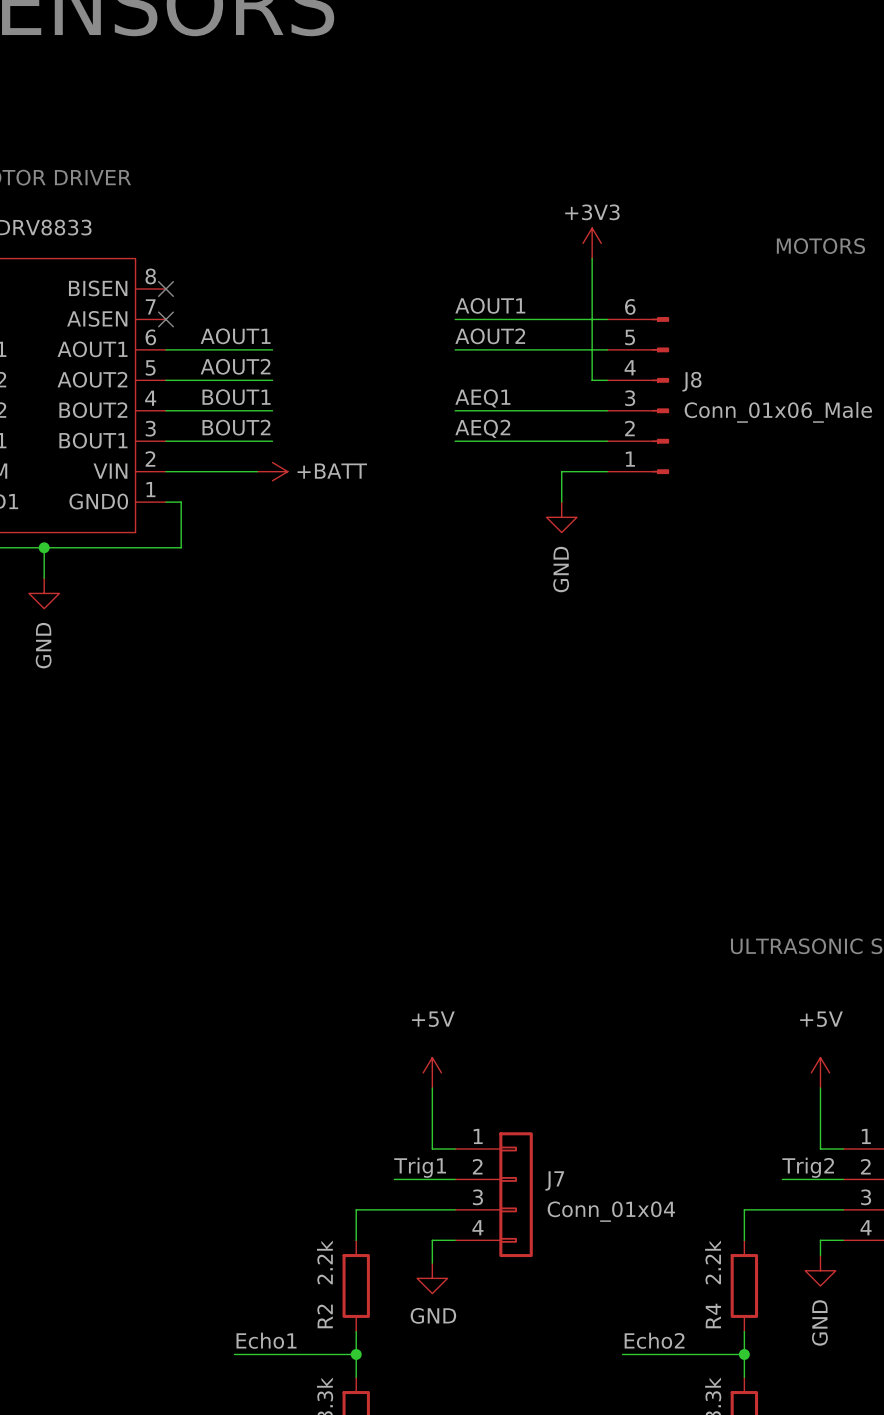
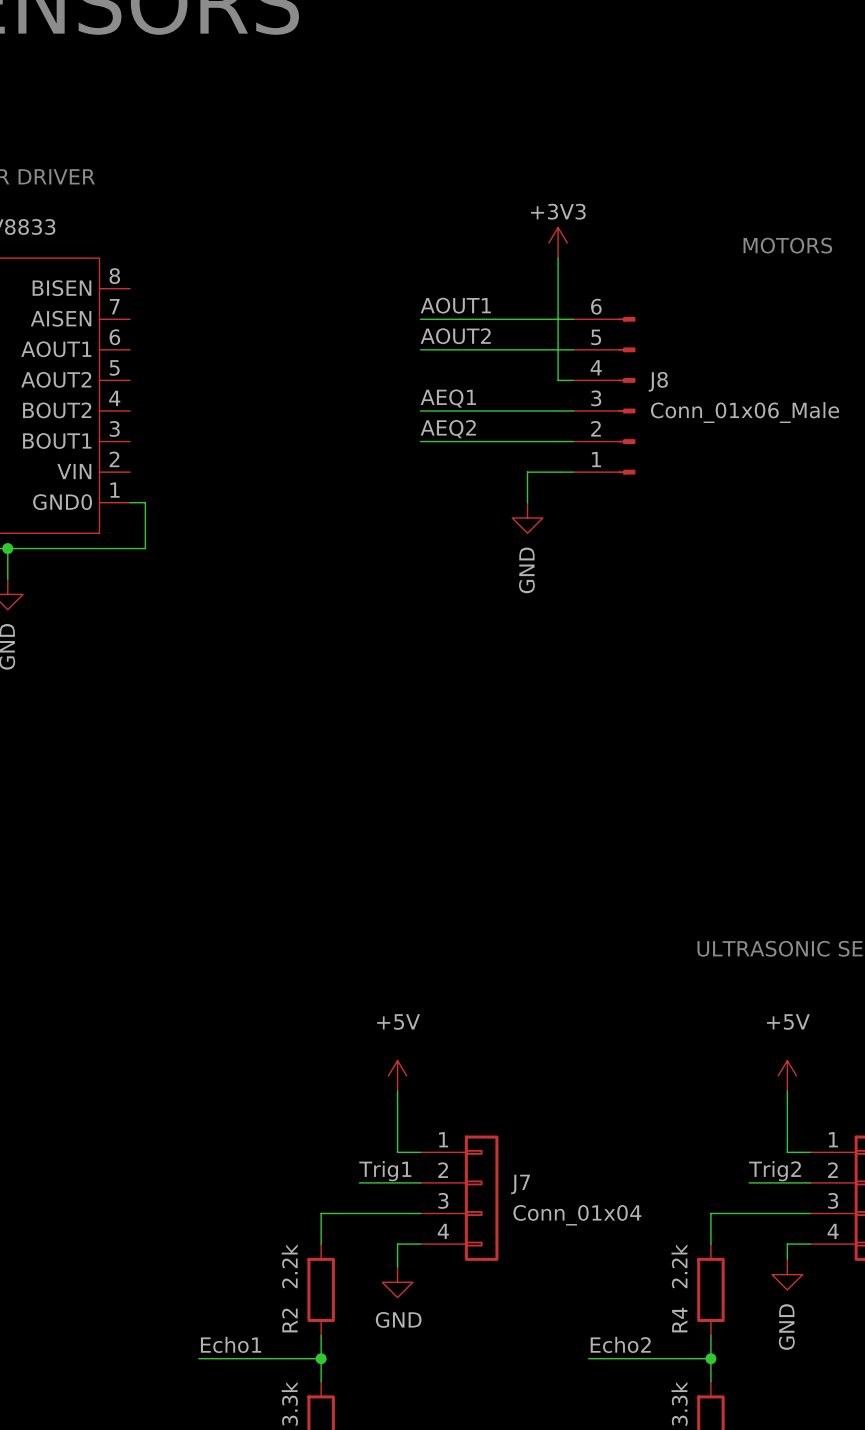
no-connect mark: (165, 289) -> none
no-connect mark: (165, 319) -> none
label: AOUT1 (235, 336) -> none
wire: (165, 349) (272, 349) -> none
label: AOUT2 (235, 366) -> none
wire: (165, 380) (272, 380) -> none
label: BOUT1 (236, 397) -> none
wire: (165, 410) (272, 410) -> none
label: BOUT2 (236, 427) -> none
wire: (165, 441) (272, 441) -> none
wire: (165, 471) (257, 471) -> none
power symbol: +BATT (272, 471) -> none

